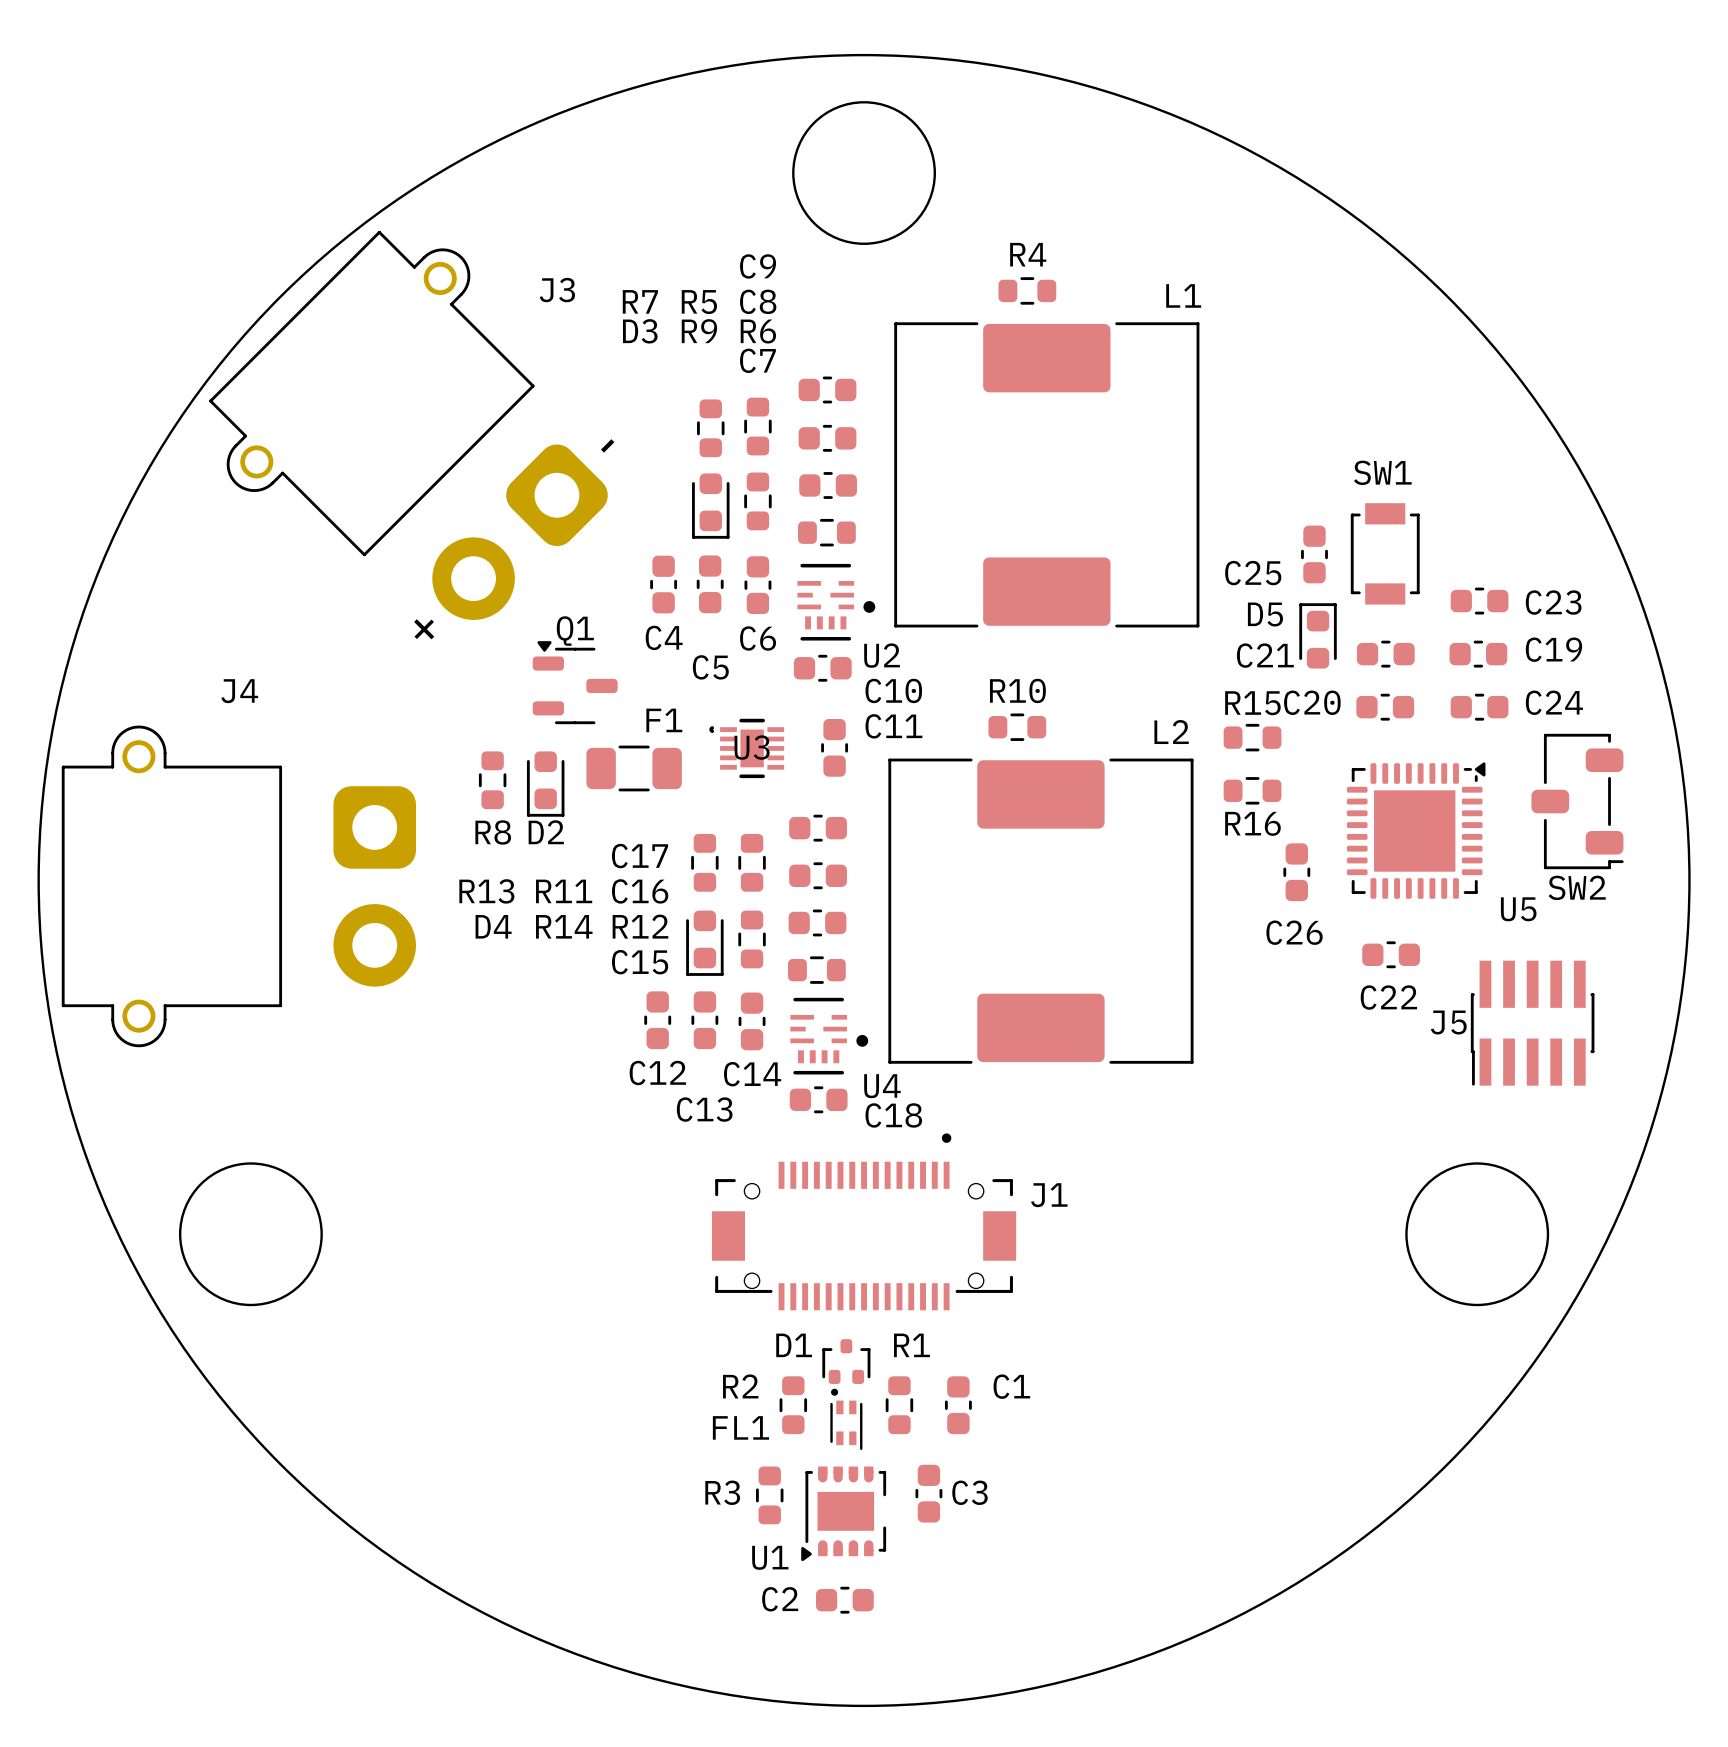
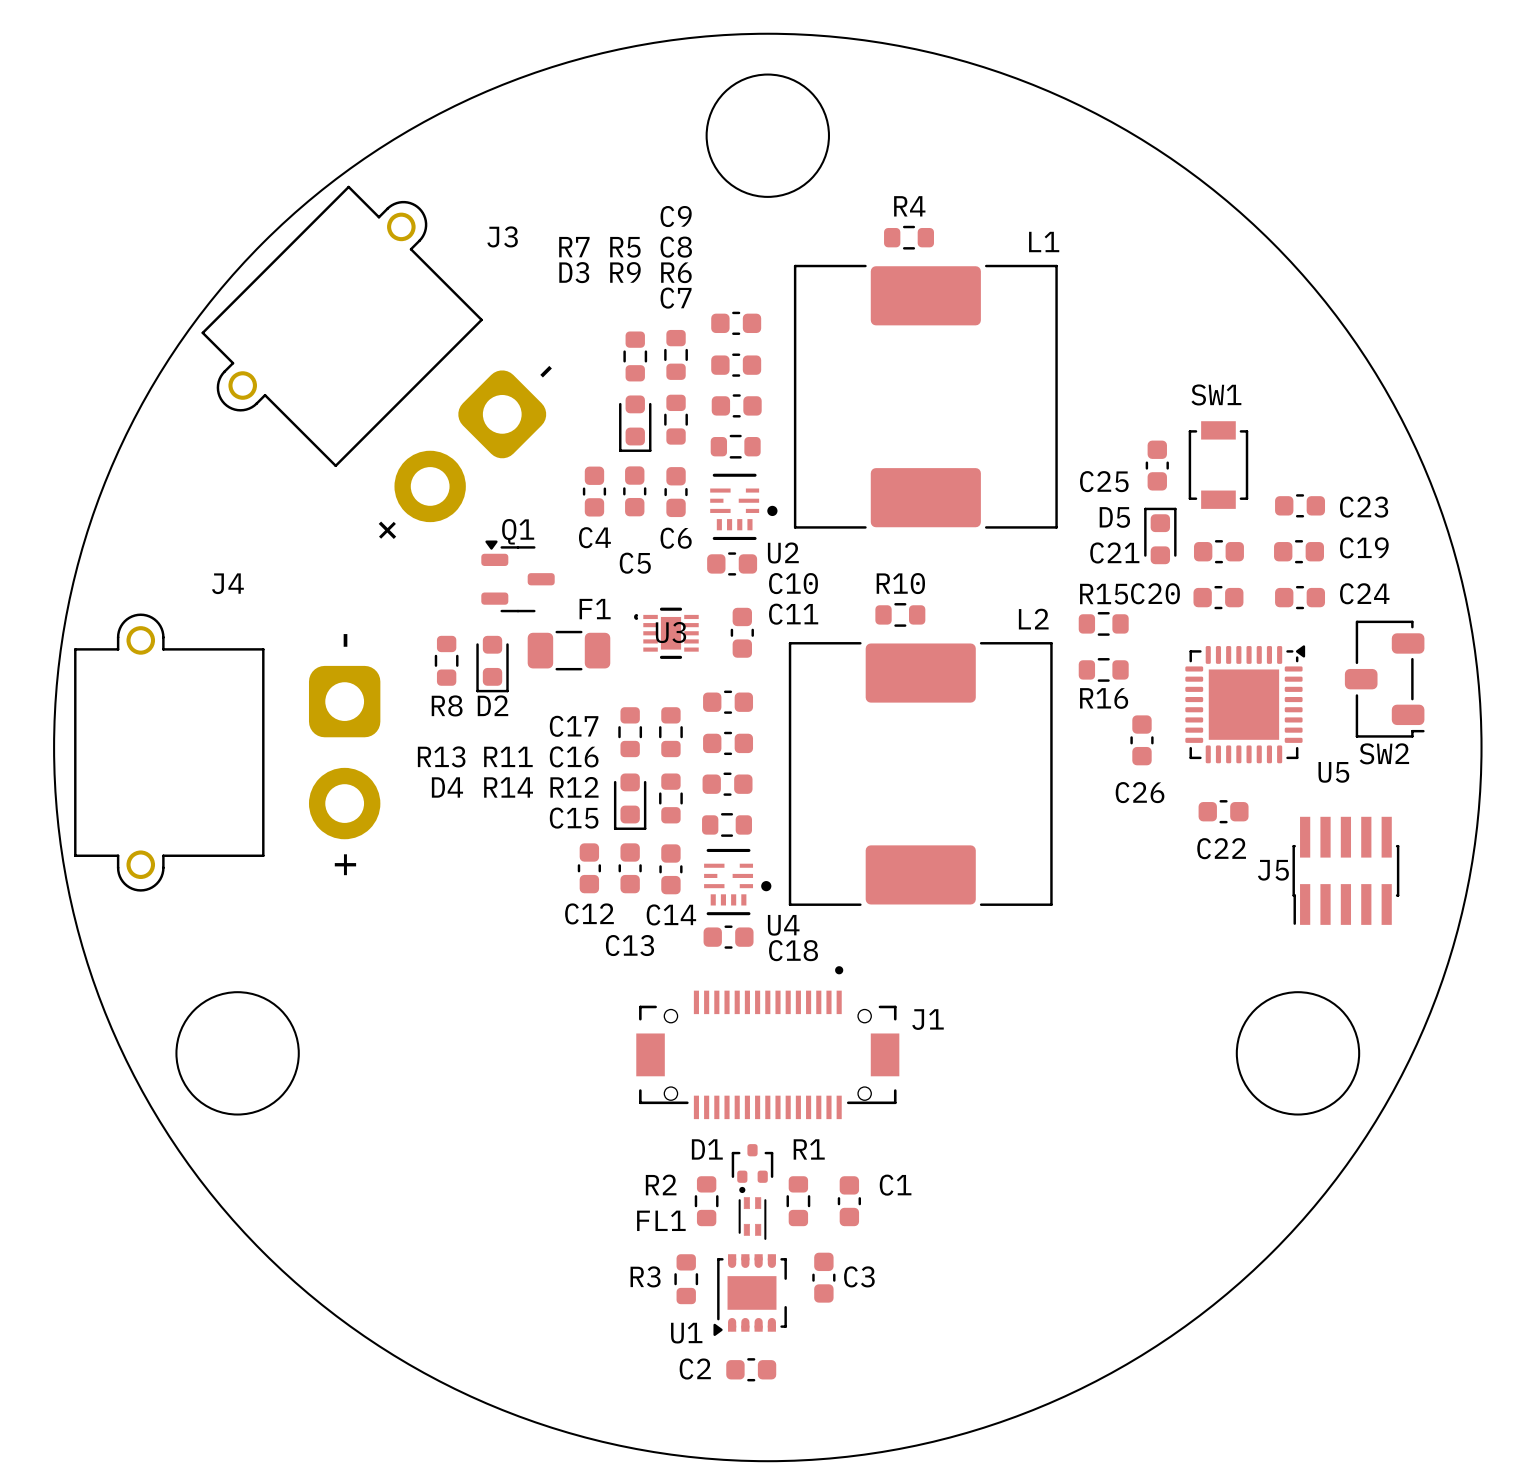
J4 text: none -> - (345, 640)
J4 text: none -> + (345, 864)

